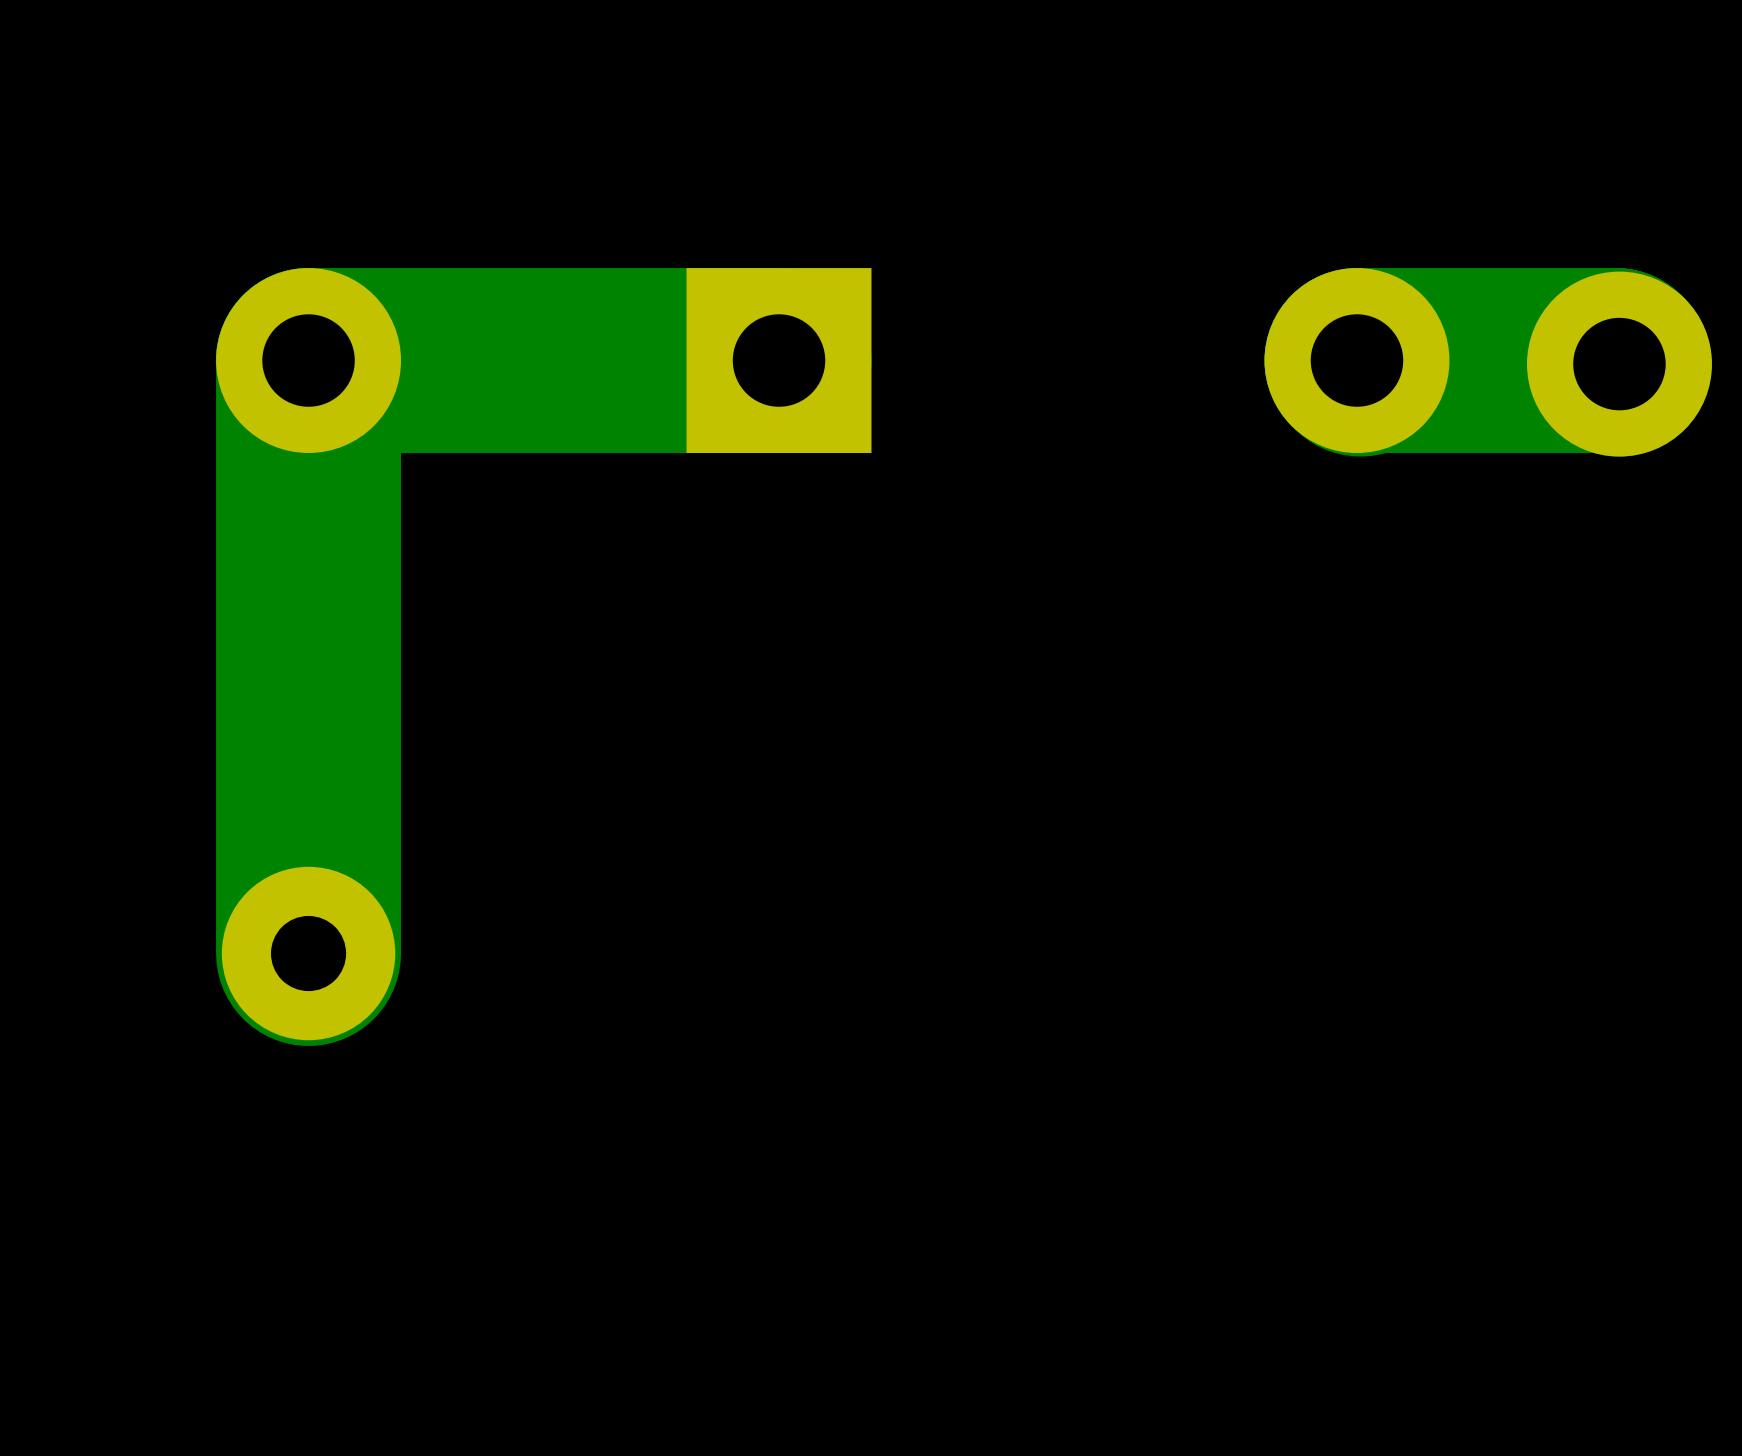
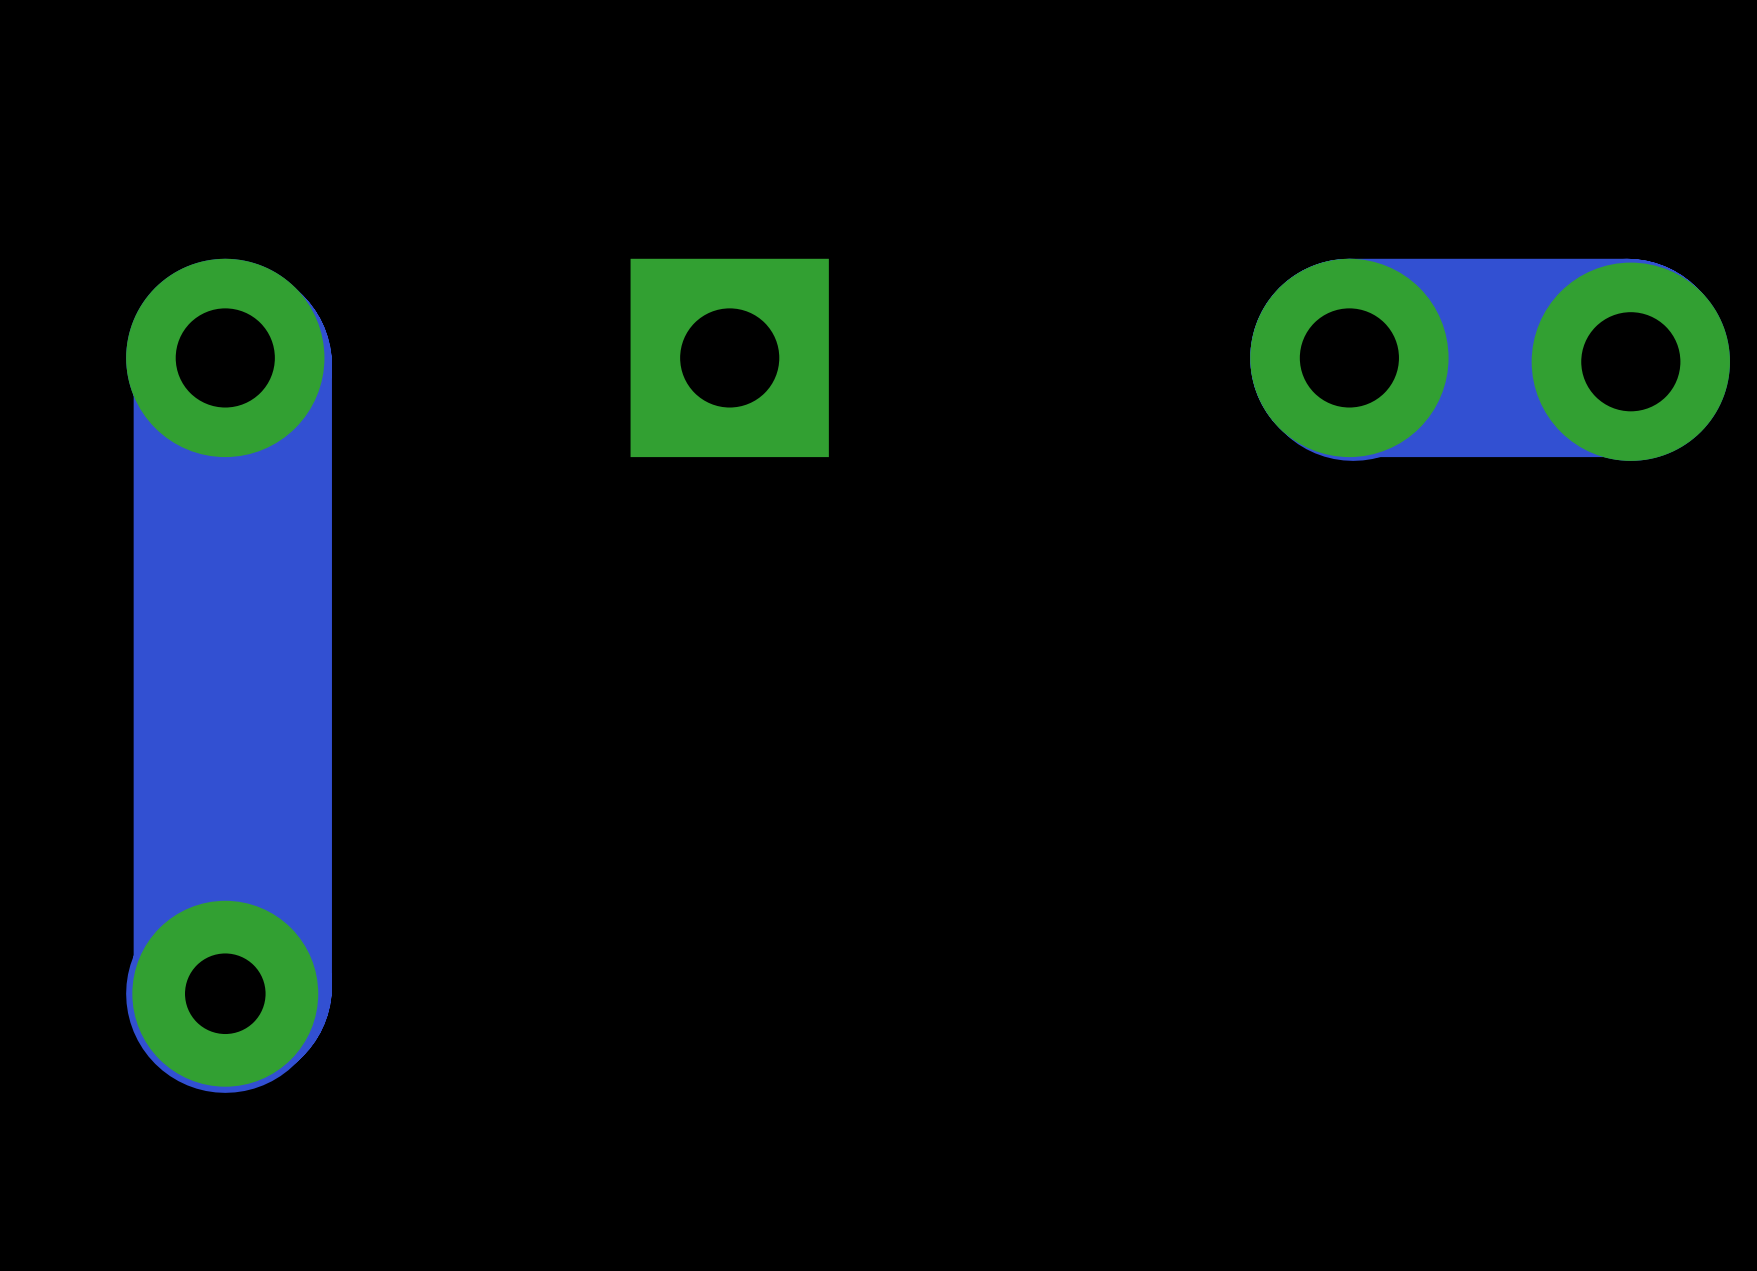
bottom track: (779, 360) (308, 360) (308, 953) -> (225, 357) (232, 365) (232, 986) (225, 993)

